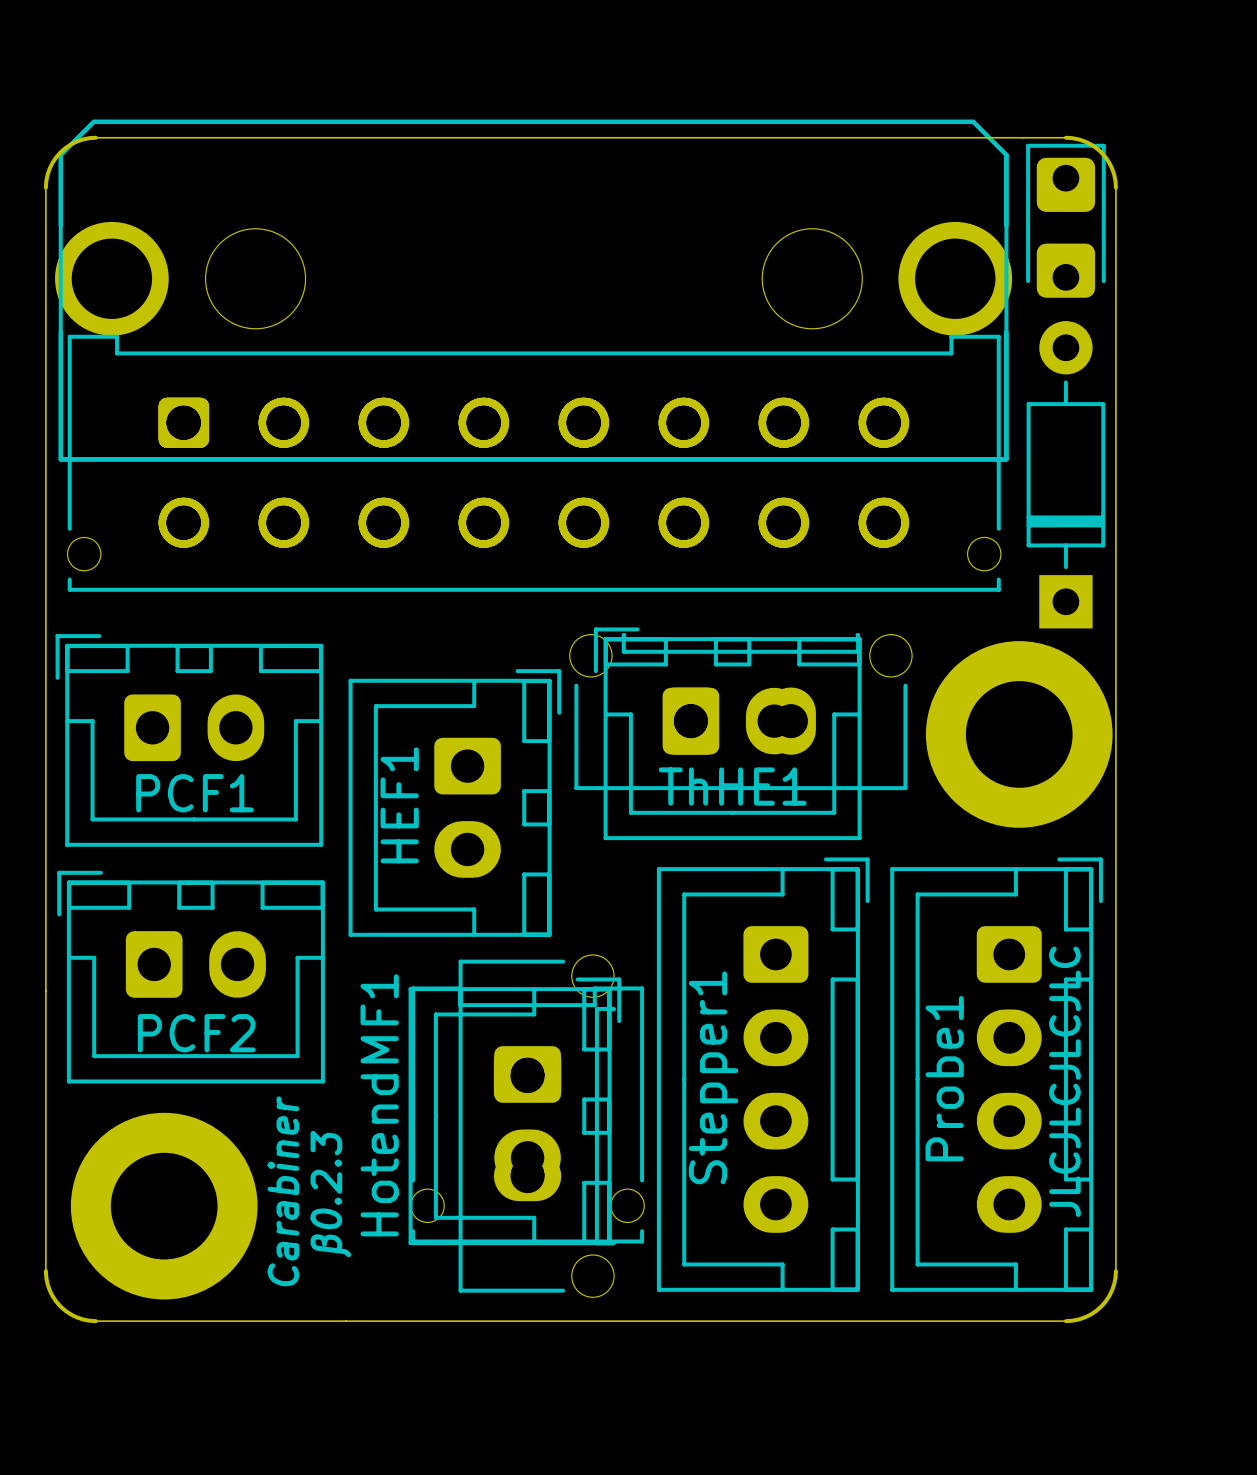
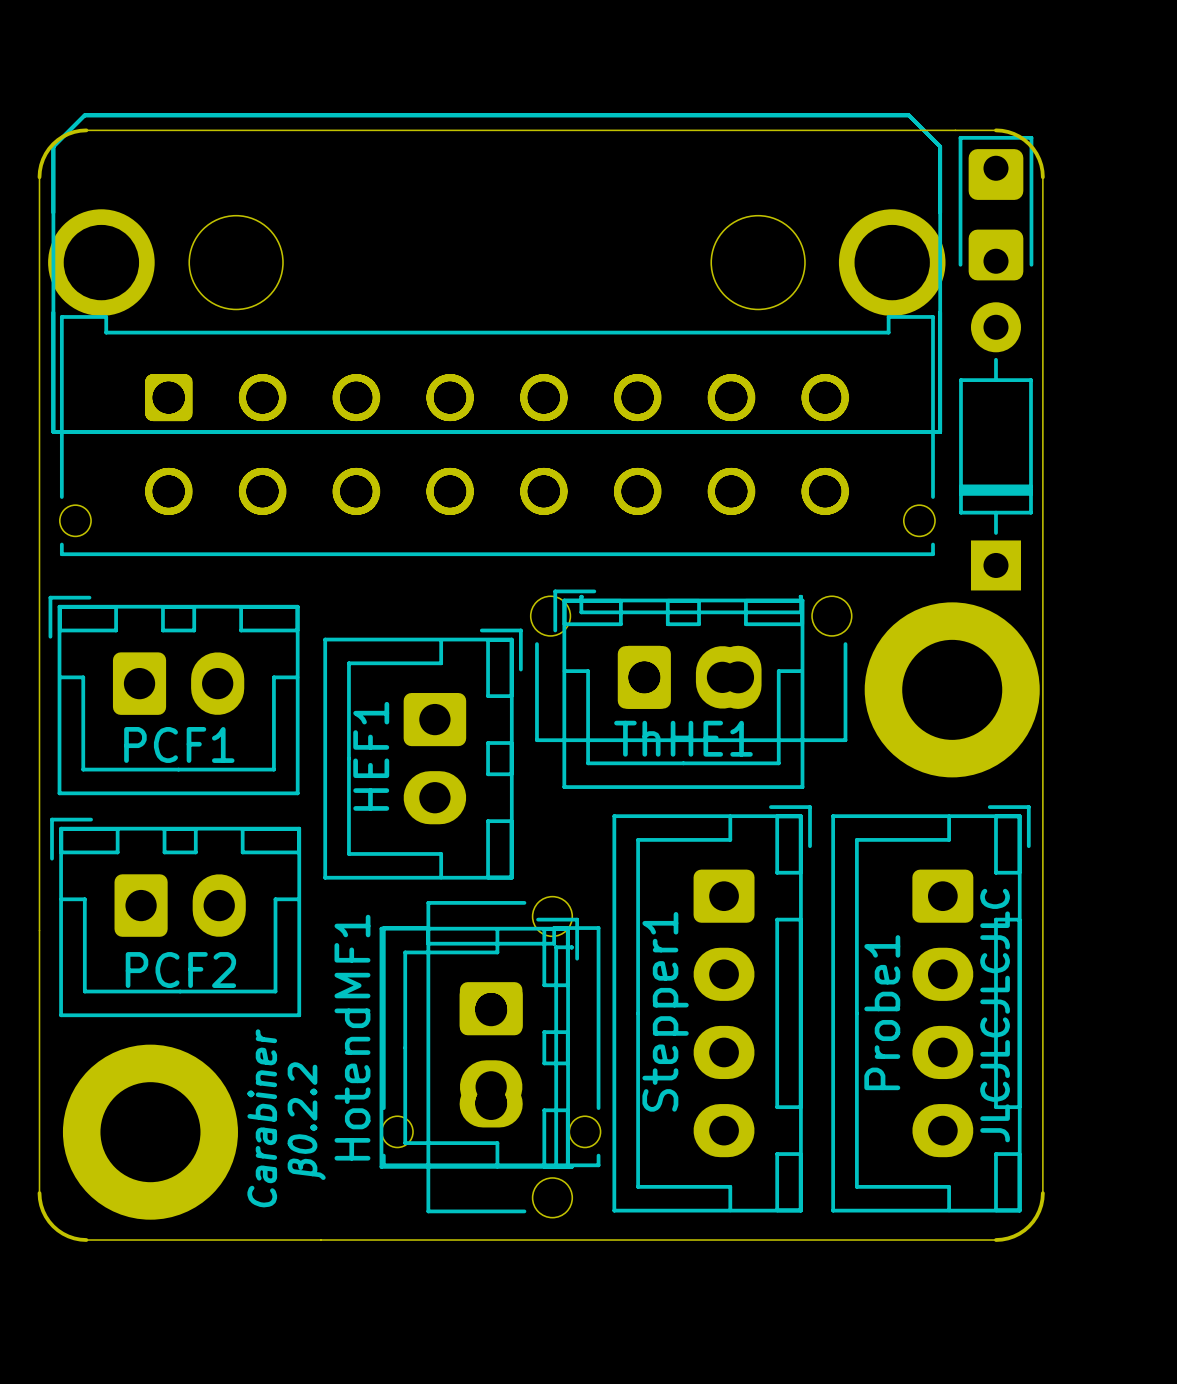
text: β0.2.3 (330, 1194) -> β0.2.2 (306, 1121)

